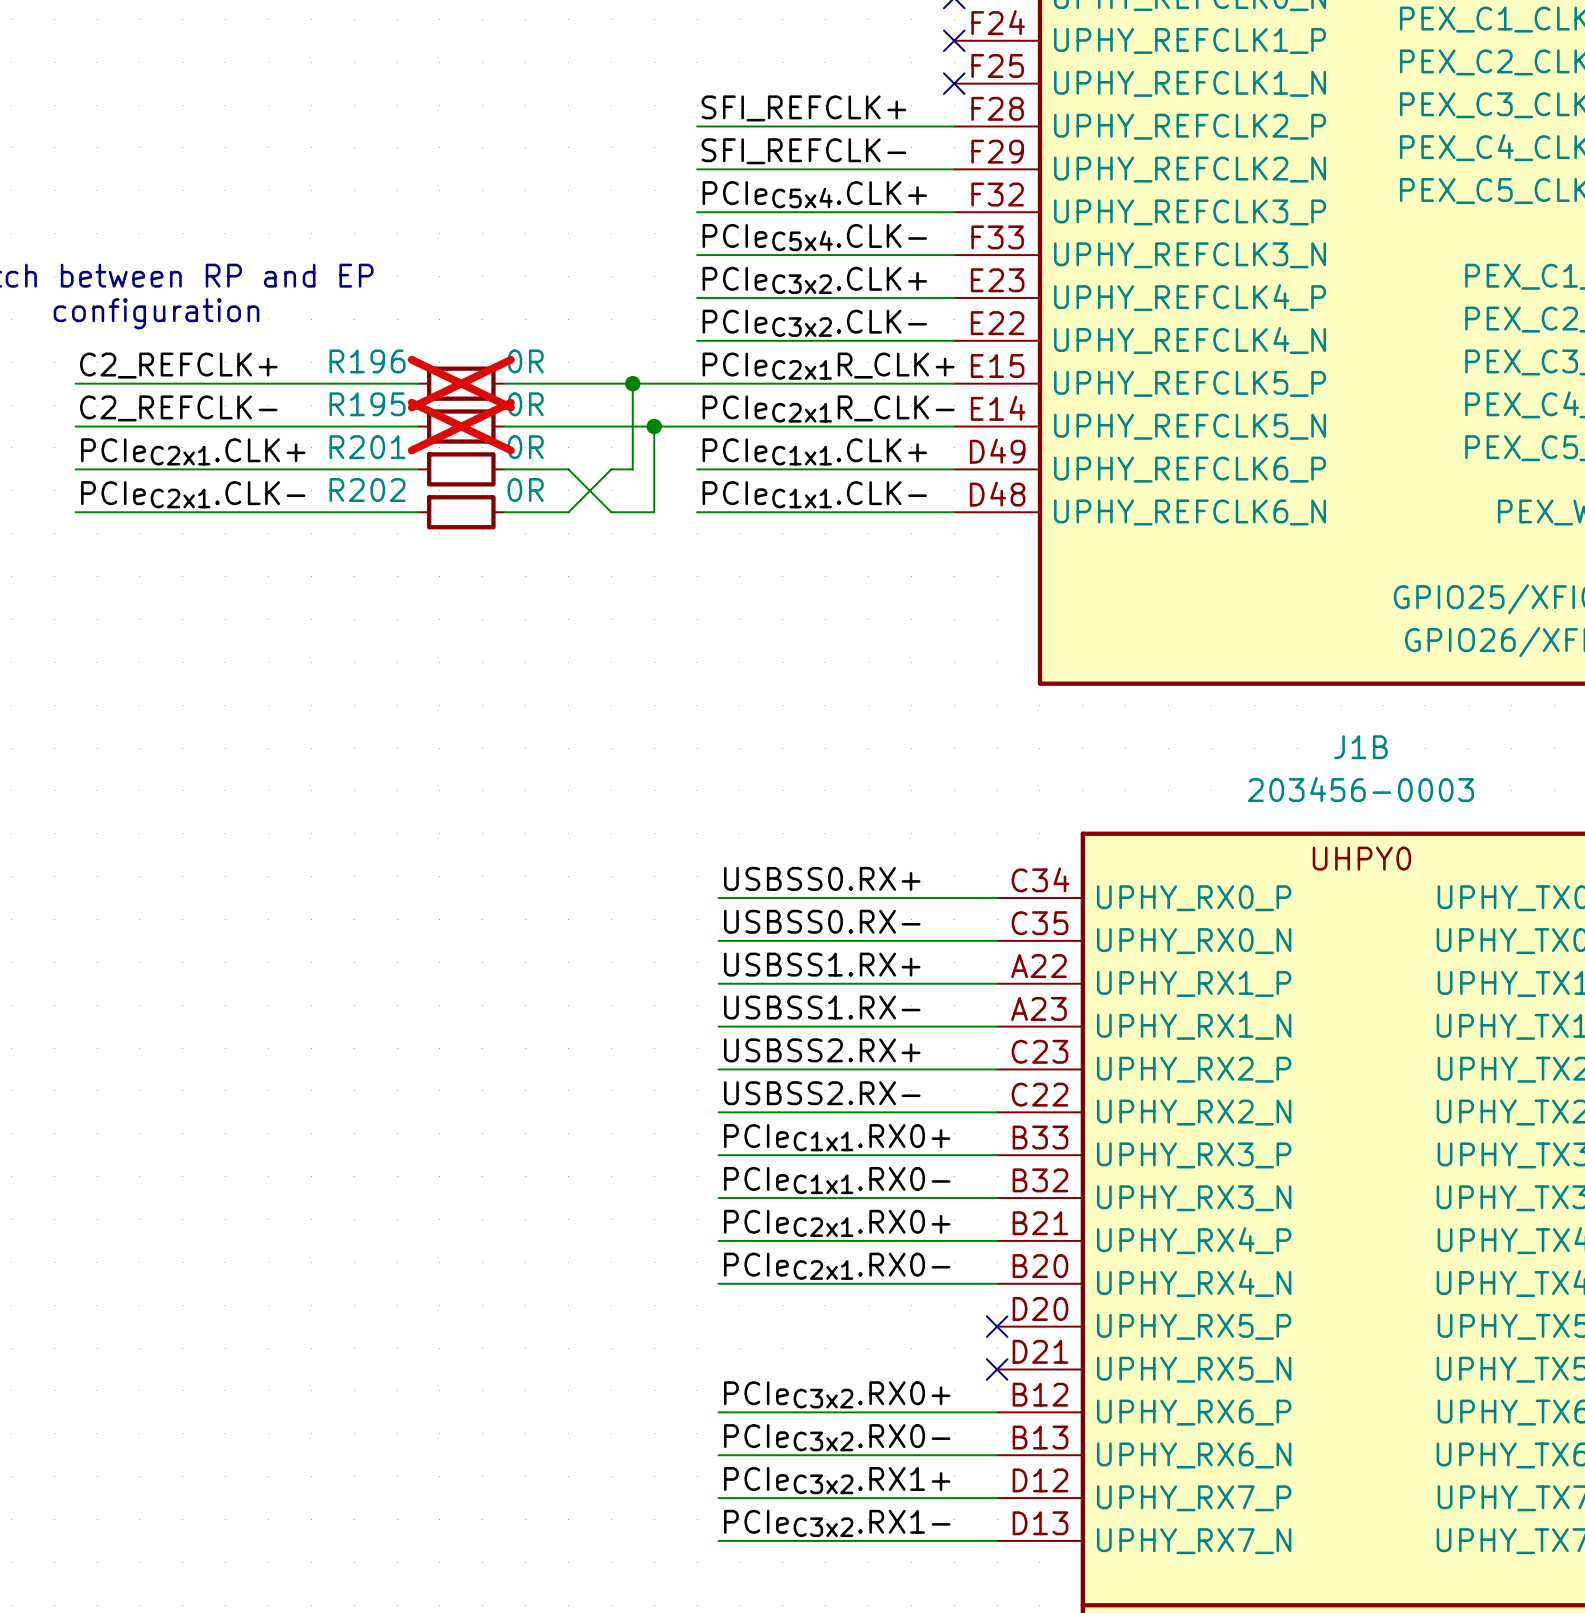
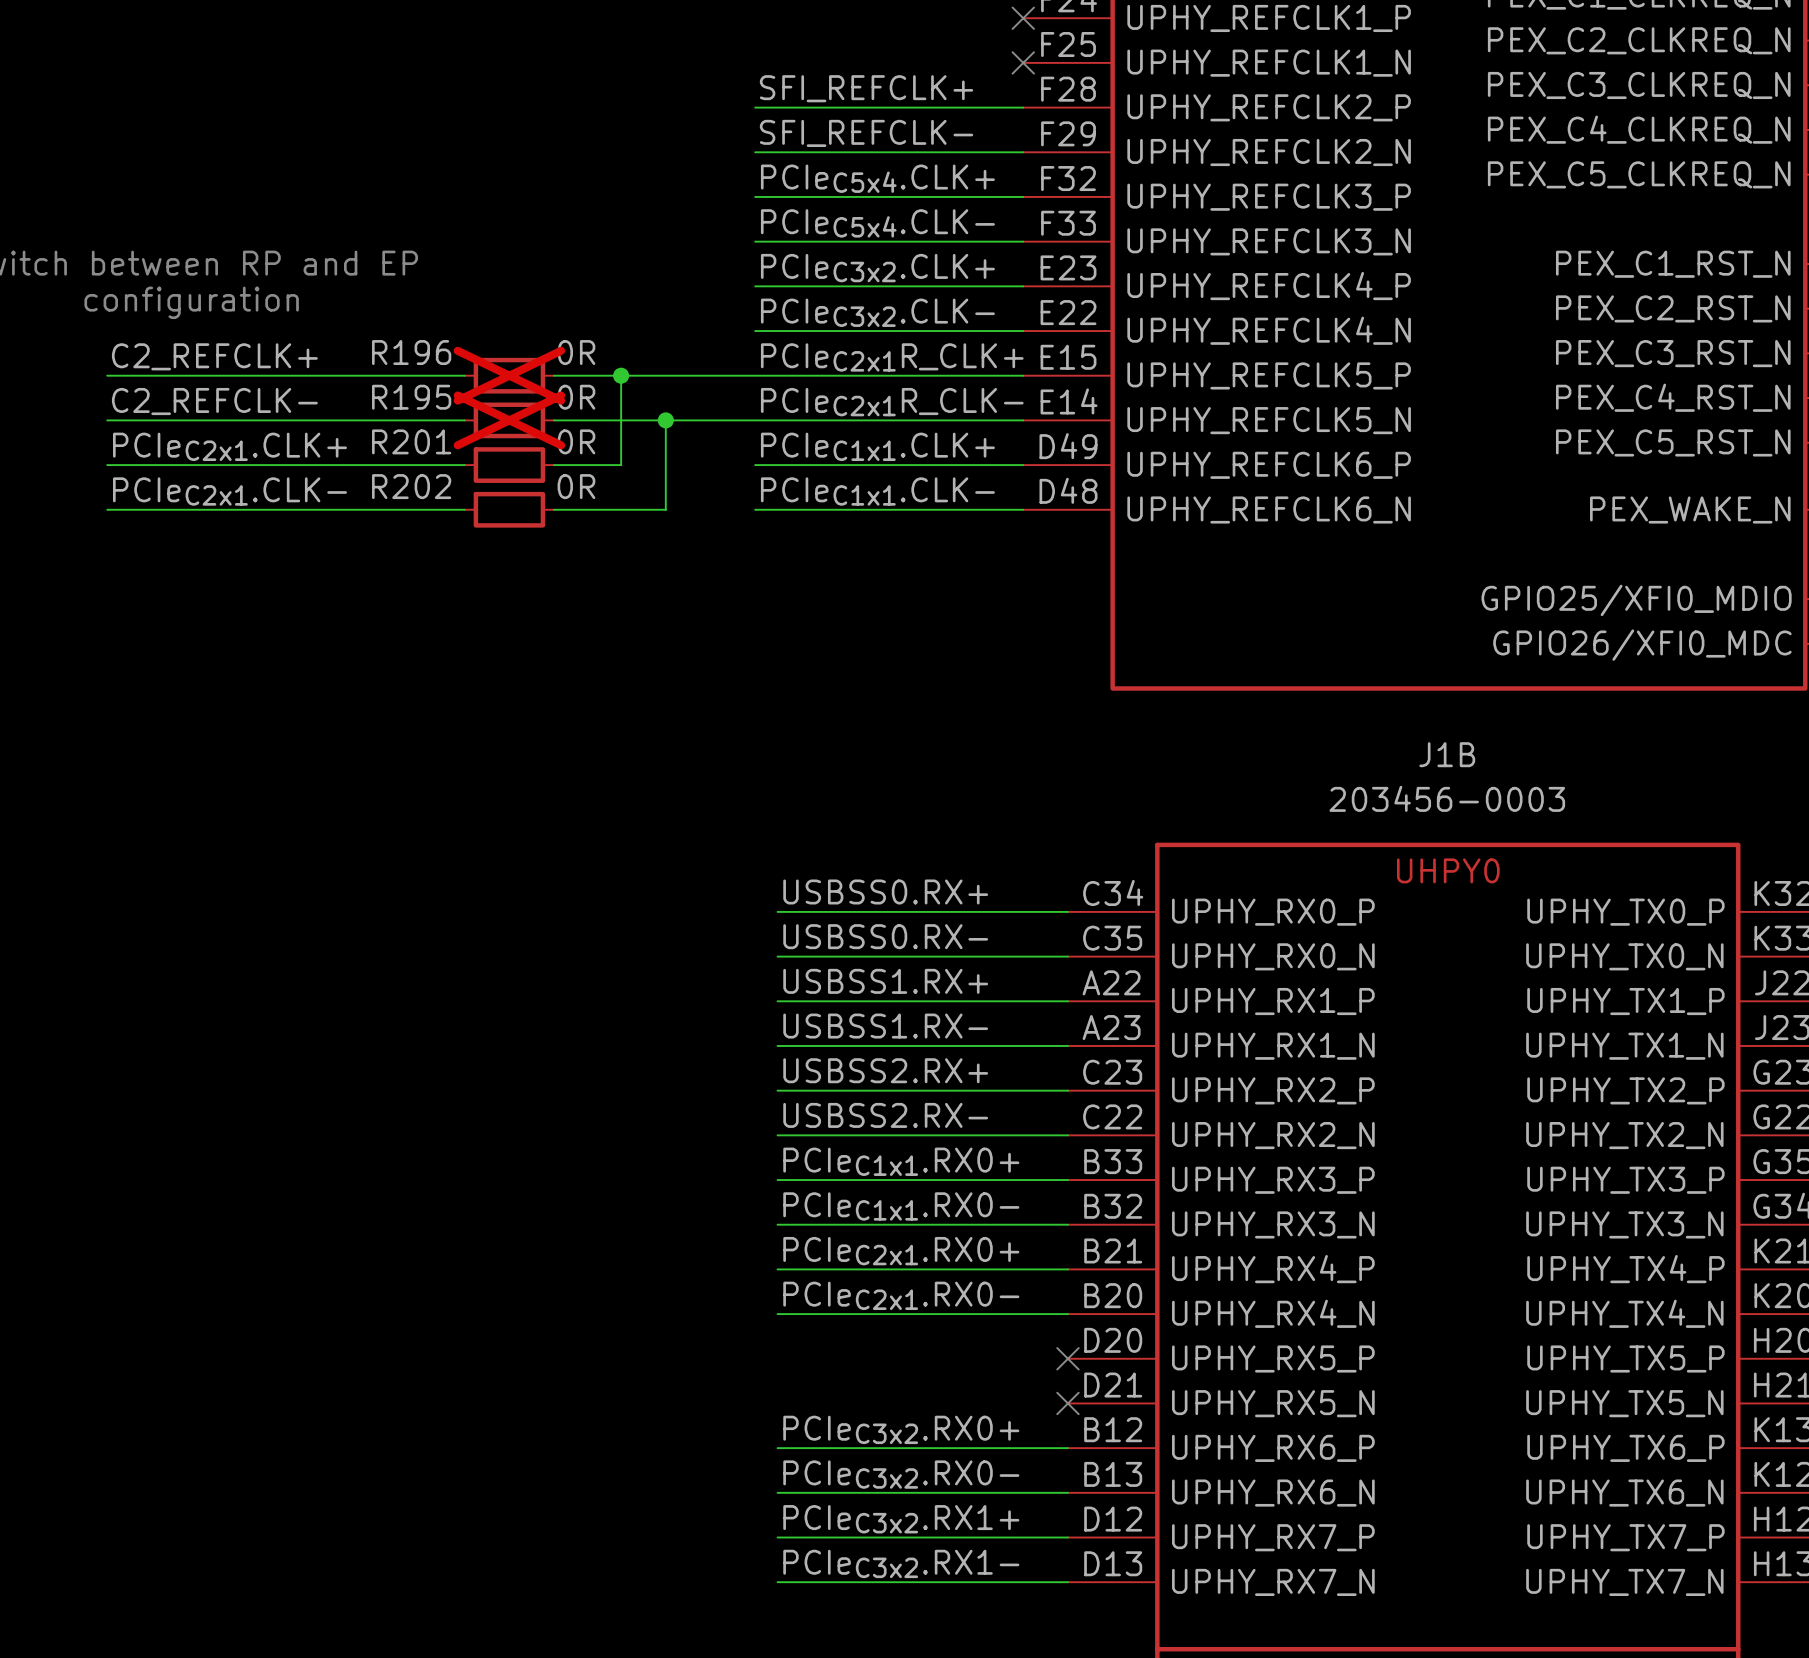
junction: none -> (621, 375)
wire: (632, 383) (632, 469) (611, 469) (568, 512) -> (665, 420) (665, 509) (621, 509)
junction: (632, 383) -> none
junction: none -> (665, 420)
wire: (654, 426) (654, 512) (611, 512) (568, 469) -> (621, 375) (621, 465)
junction: (654, 426) -> none

